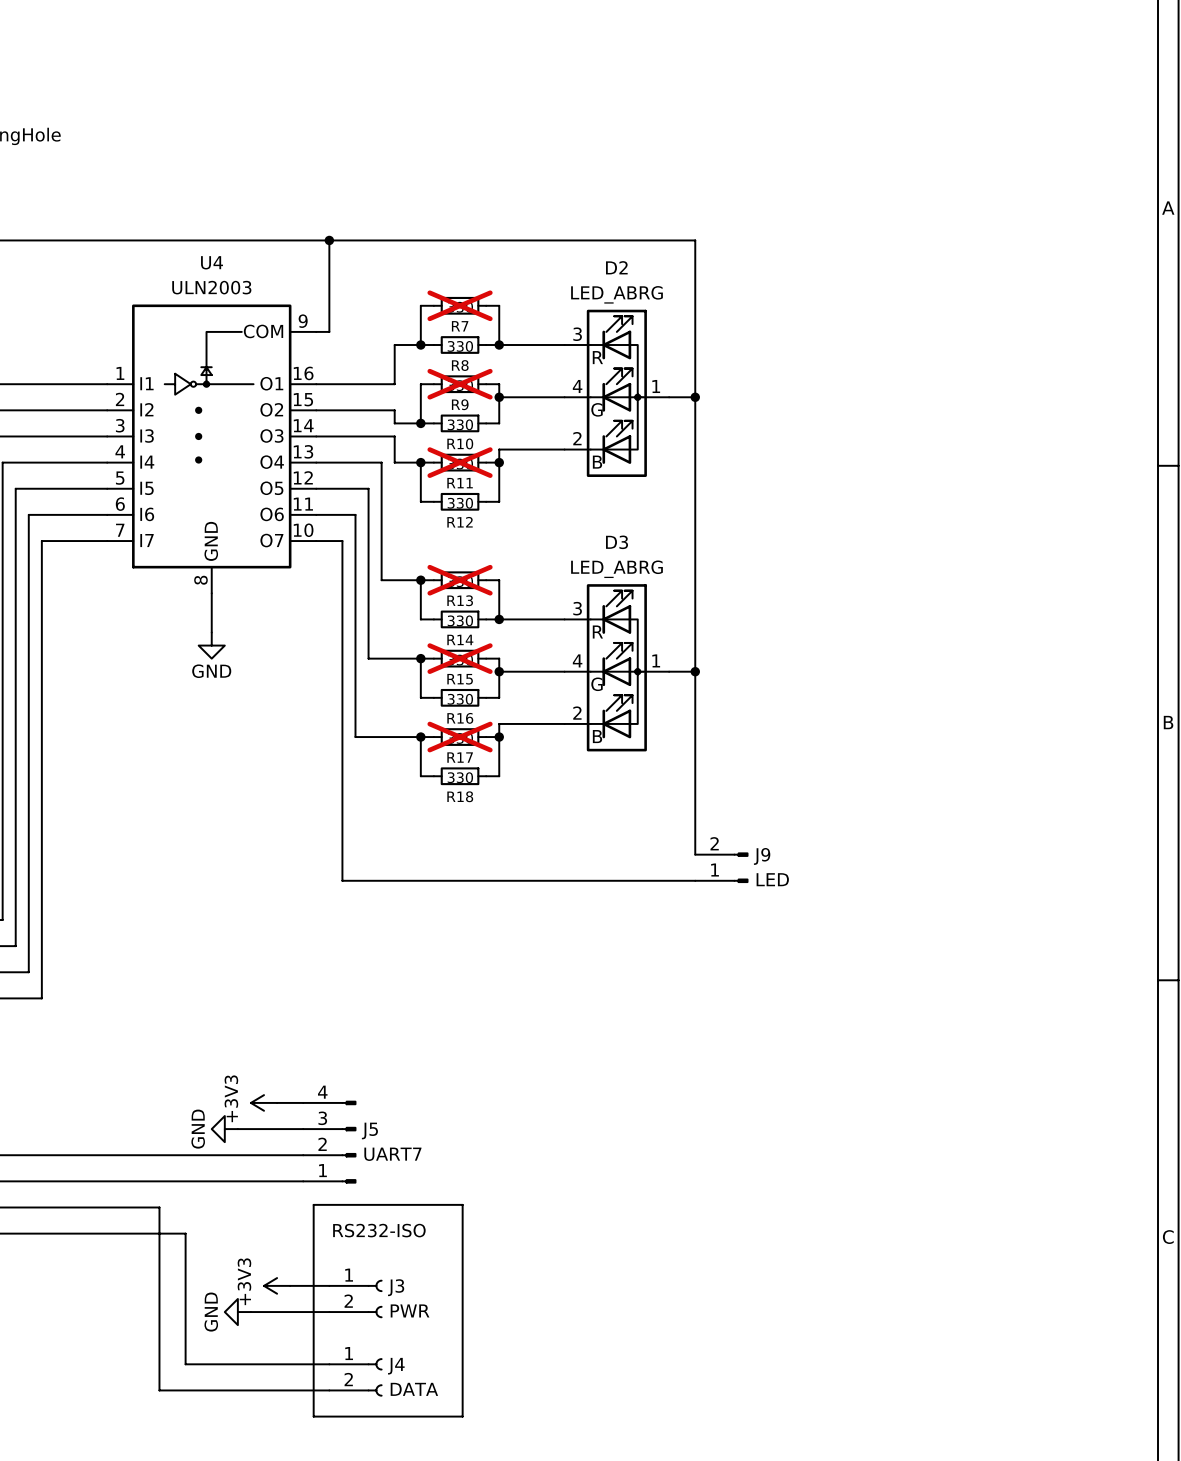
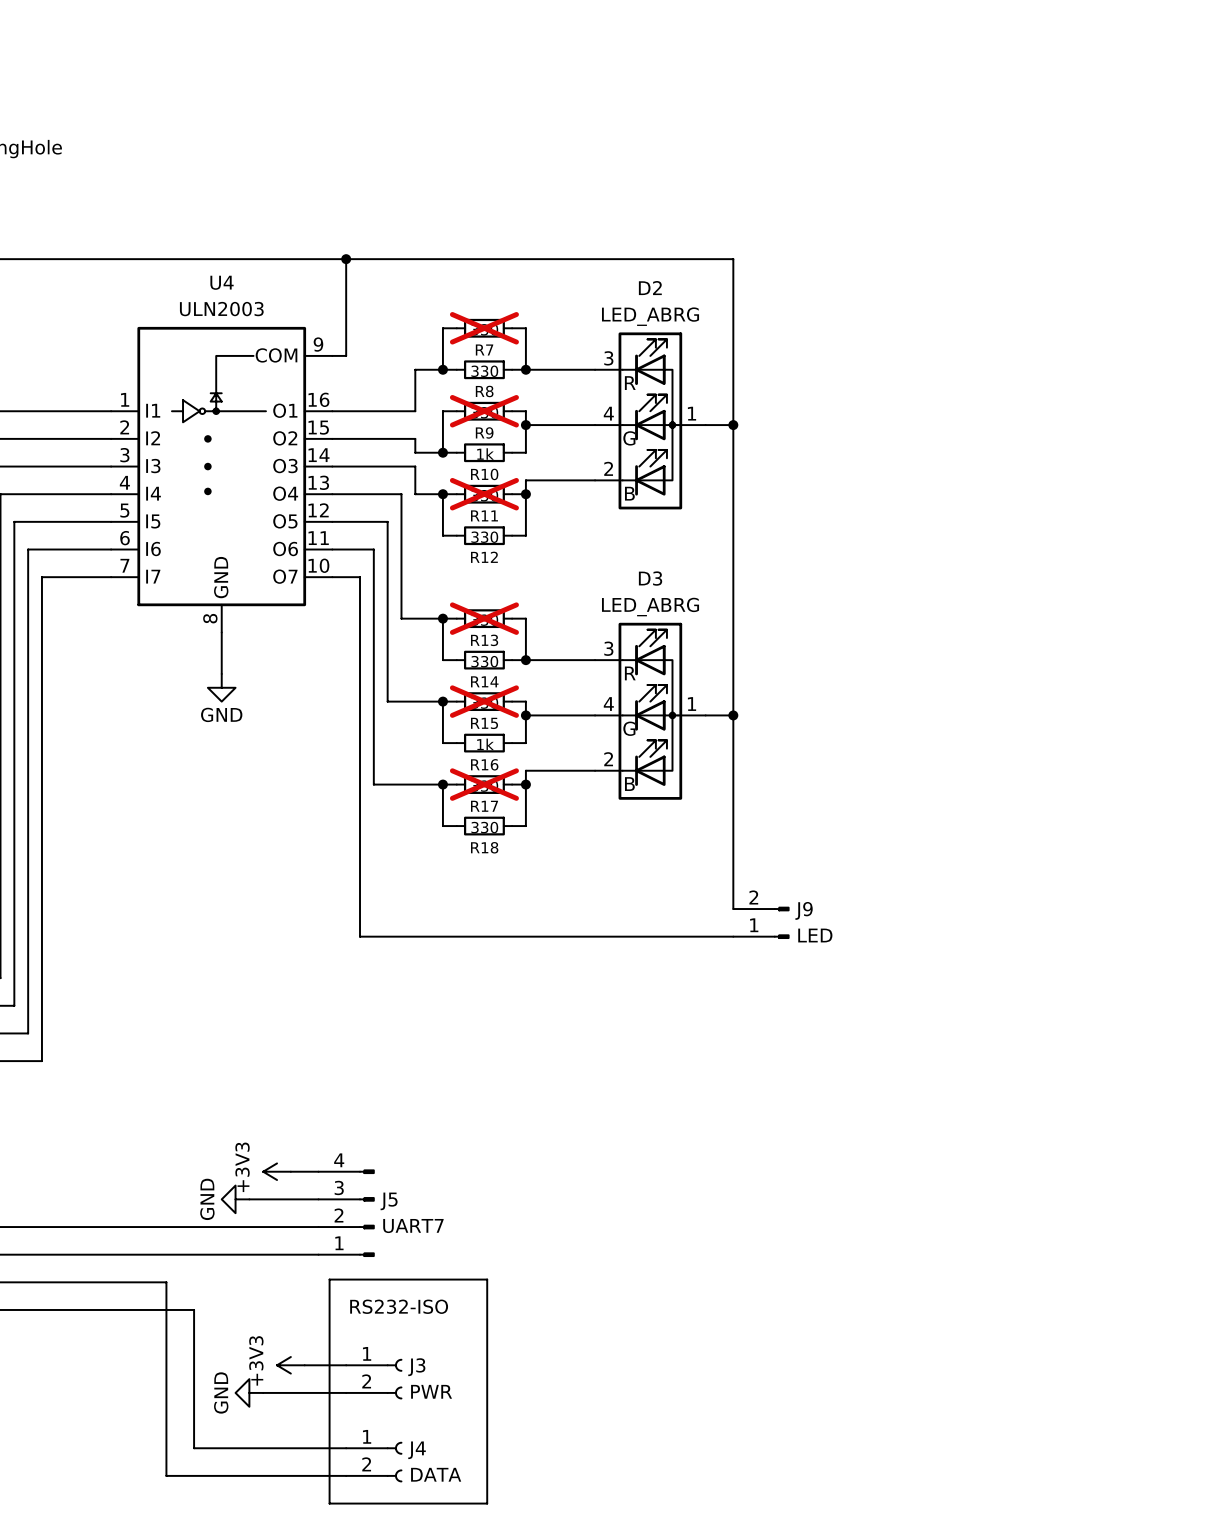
R10 value: 330 (460, 424) -> 1k (485, 454)
R16 value: 330 (460, 699) -> 1k (485, 744)

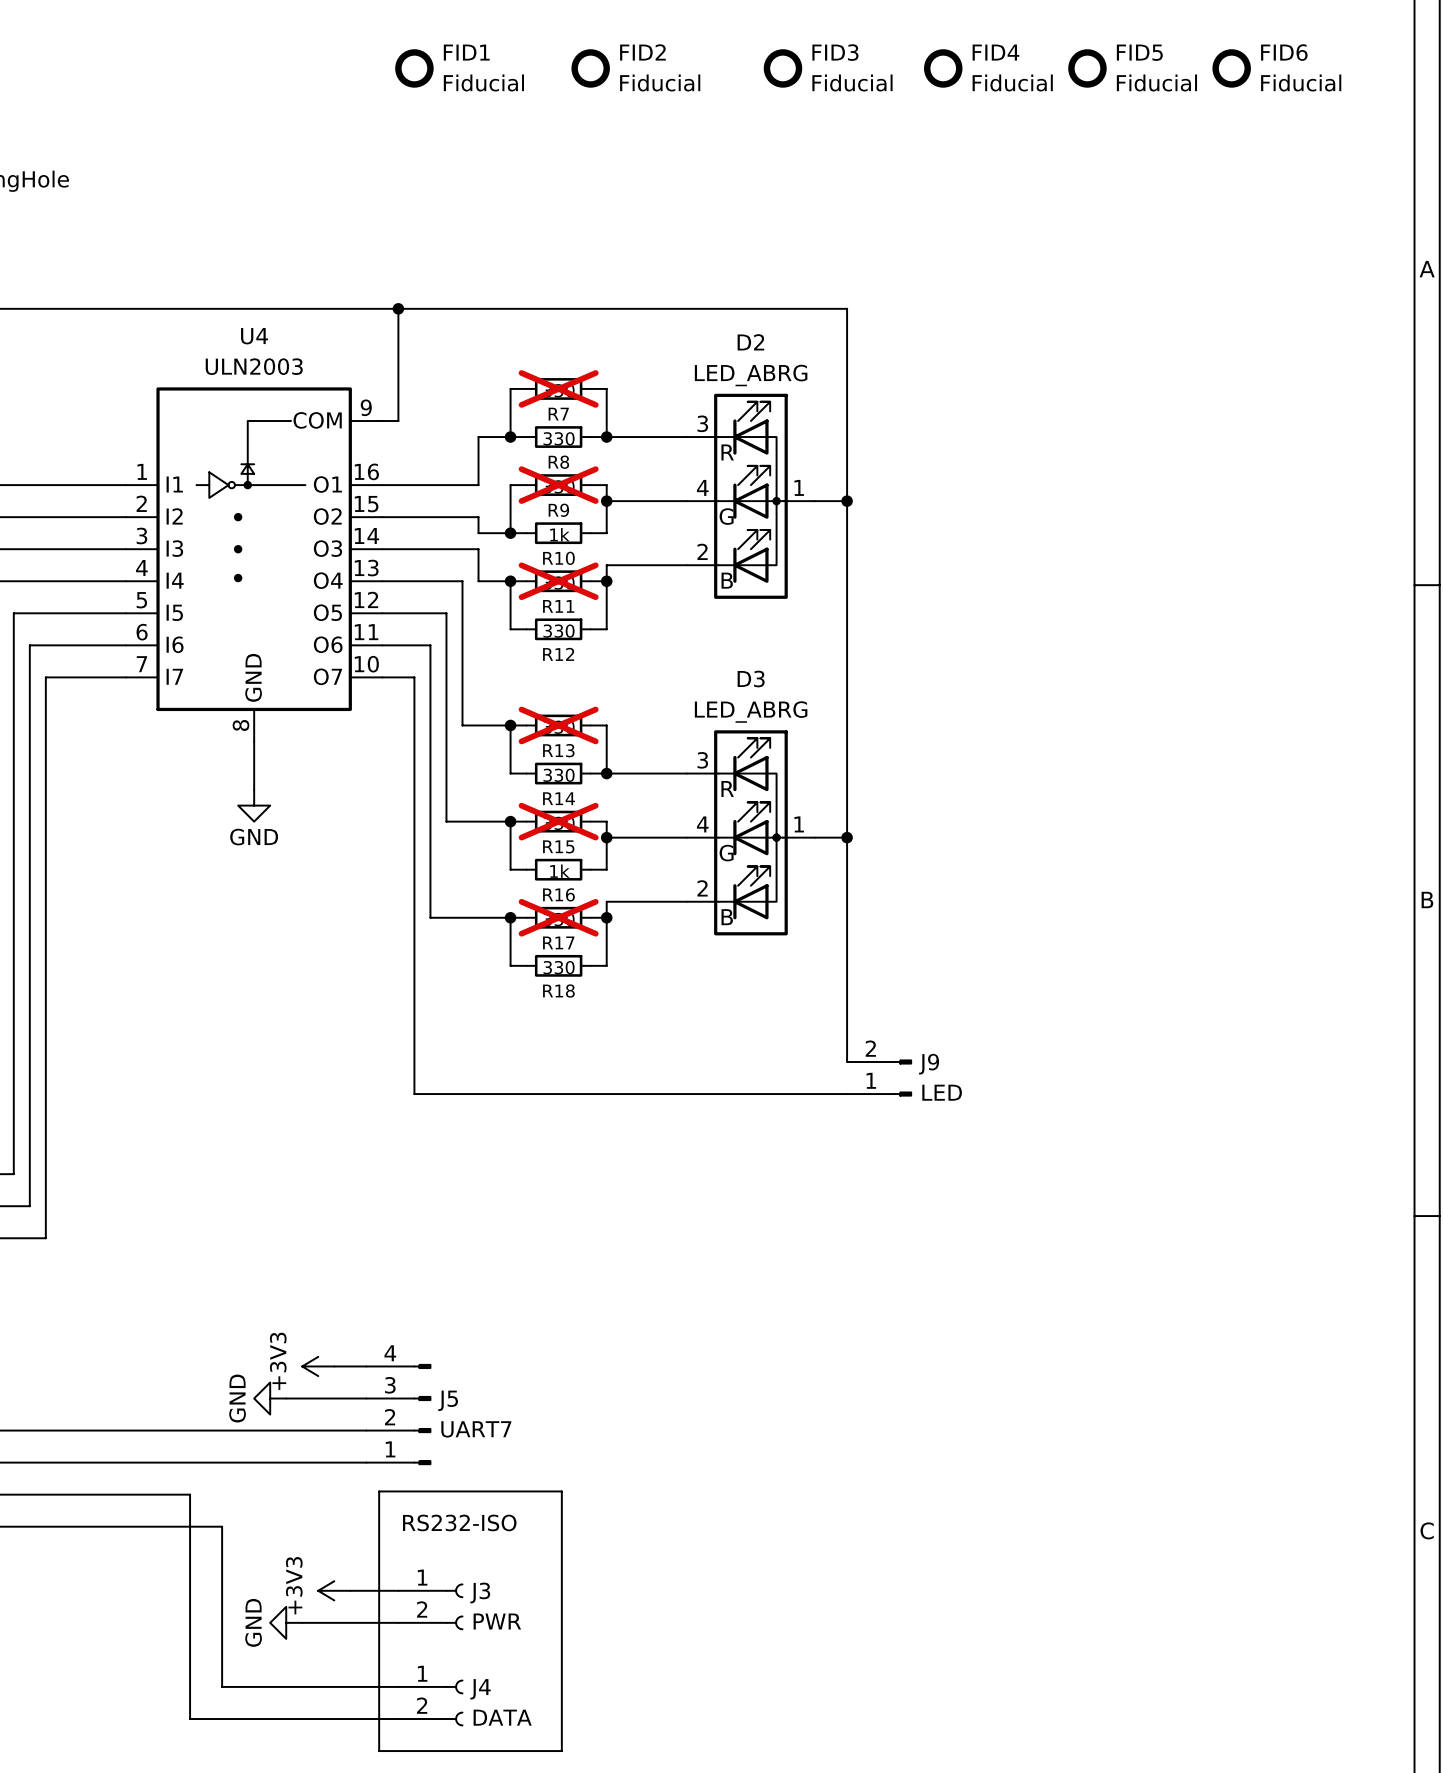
FID1: none -> Fiducial (414, 68)
FID2: none -> Fiducial (590, 68)
FID3: none -> Fiducial (782, 68)
FID4: none -> Fiducial (943, 68)
FID5: none -> Fiducial (1087, 68)
FID6: none -> Fiducial (1231, 68)

